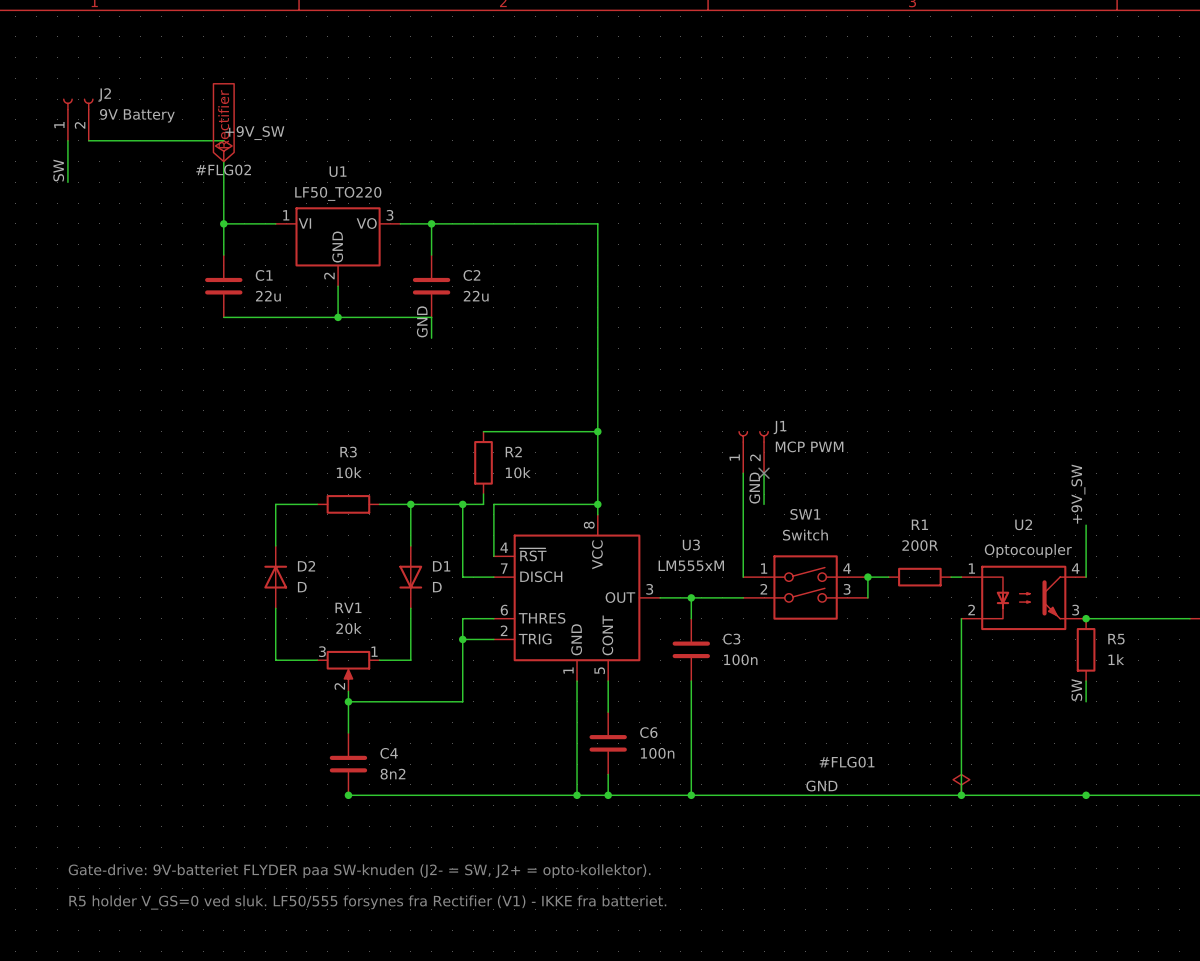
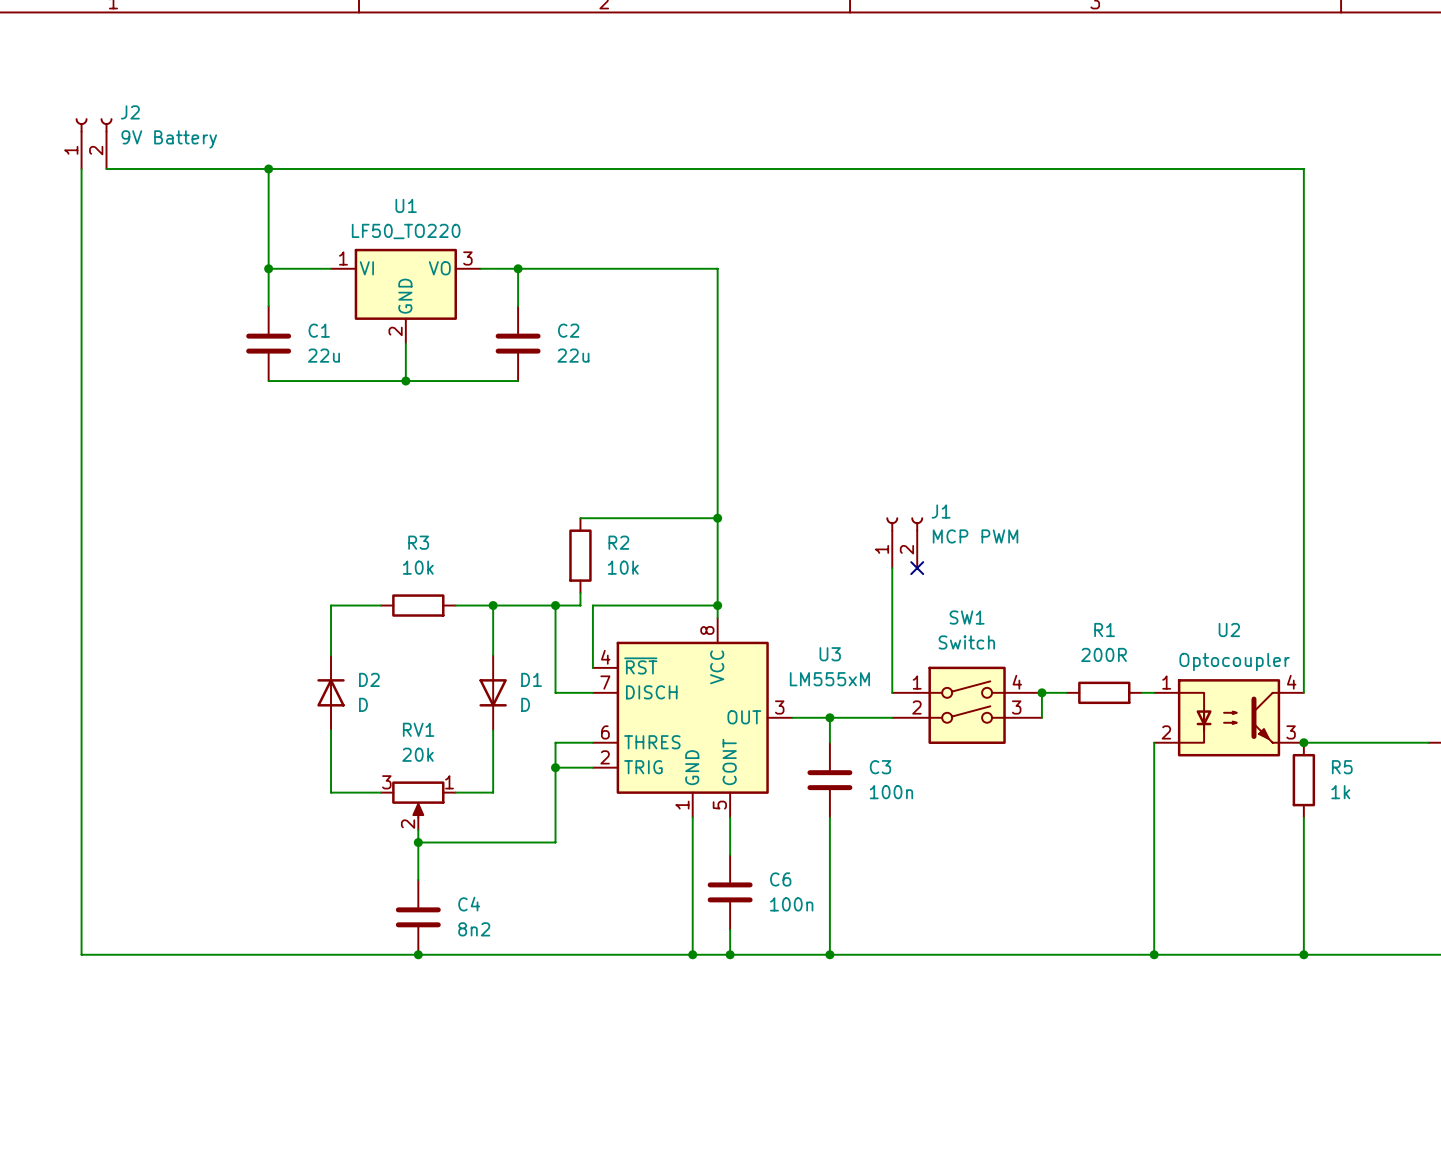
global label: Rectifier (223, 119) -> none
label: +9V_SW (254, 133) -> none
junction: none -> (268, 168)
#FLG02: (223, 151) -> none
wire: none -> (268, 193) (268, 168) (1303, 168) (1303, 630)
label: SW (58, 170) -> none
wire: none -> (81, 218) (81, 954) (418, 954)
wire: (431, 317) (431, 338) -> none
label: GND (422, 321) -> none
wire: (764, 473) (764, 504) -> none
label: GND (754, 488) -> none
label: +9V_SW (1078, 494) -> none
label: SW (1076, 689) -> none
wire: none -> (1303, 842) (1303, 954)
#FLG01: (961, 784) -> none
label: GND (821, 786) -> none
text: Gate-drive: 9V-batteriet FLYDER paa SW-knuden (J2- = SW, J2+ = opto-kollektor). (359, 871) -> none
text: R5 holder V_GS=0 ved sluk. LF50/555 forsynes fra Rectifier (V1) - IKKE fra batteriet. (367, 902) -> none

